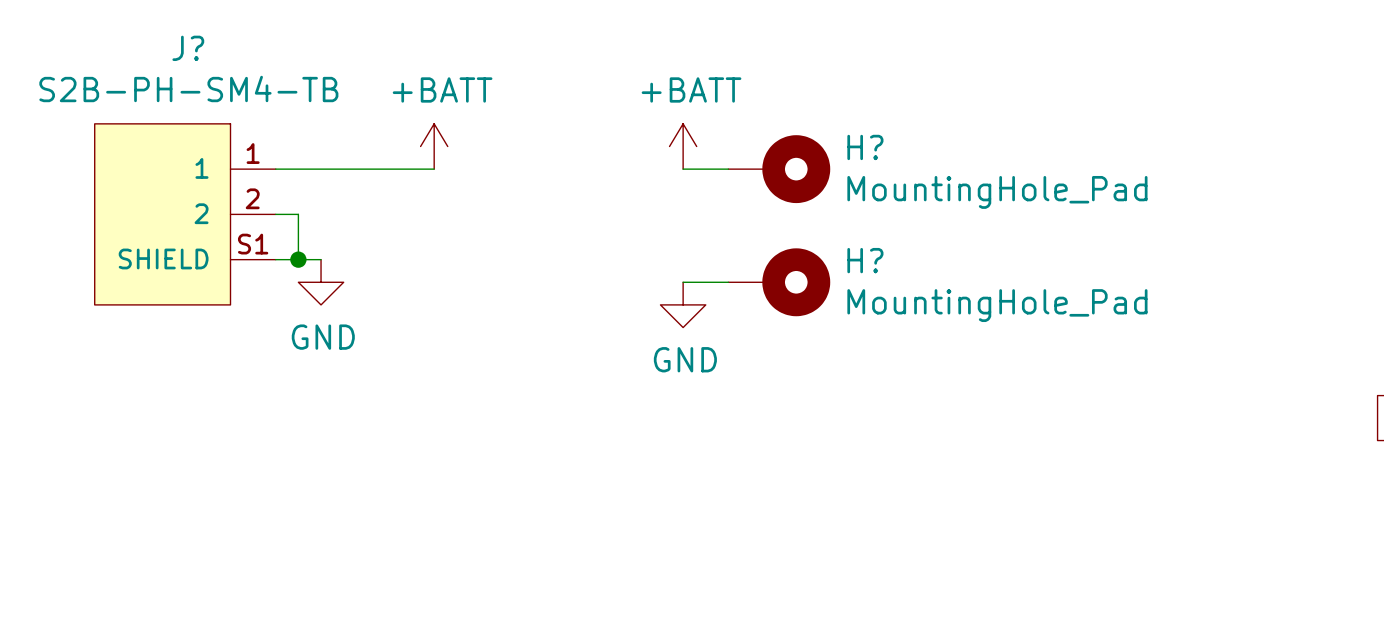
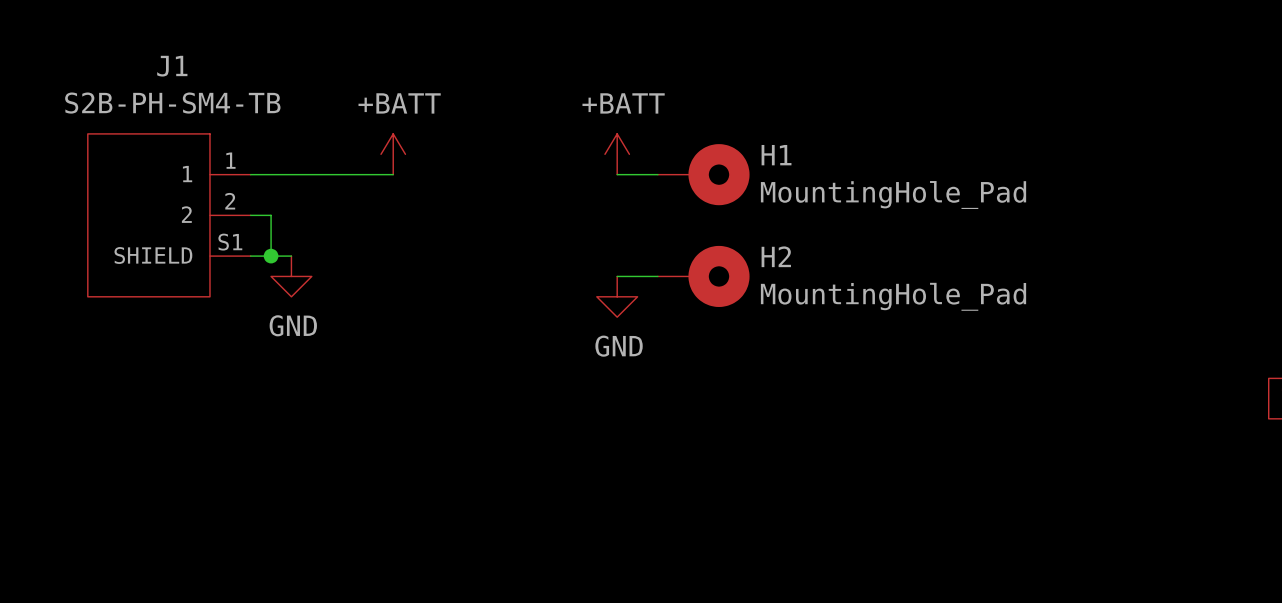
J? name: J? (188, 48) -> J1 (172, 66)
H? name: H? (865, 147) -> H1 (776, 155)
H? name: H? (865, 260) -> H2 (776, 256)

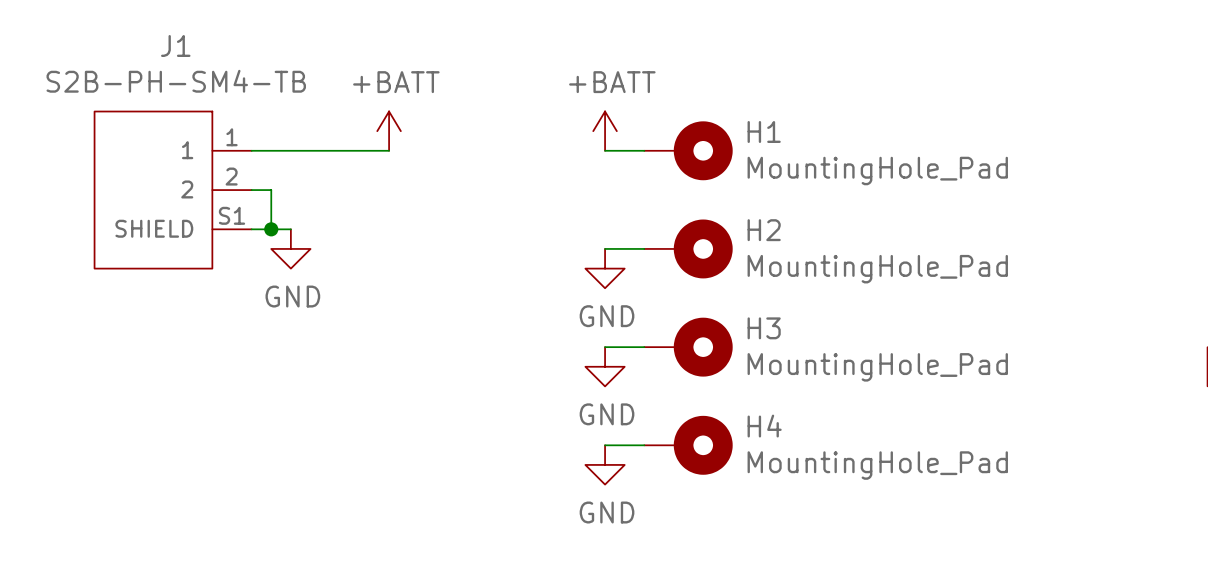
wire: none -> (605, 347) (644, 347)
H3: none -> MountingHole_Pad (688, 347)
power symbol: none -> GND (605, 366)
wire: none -> (605, 445) (644, 445)
H4: none -> MountingHole_Pad (688, 445)
power symbol: none -> GND (605, 464)

